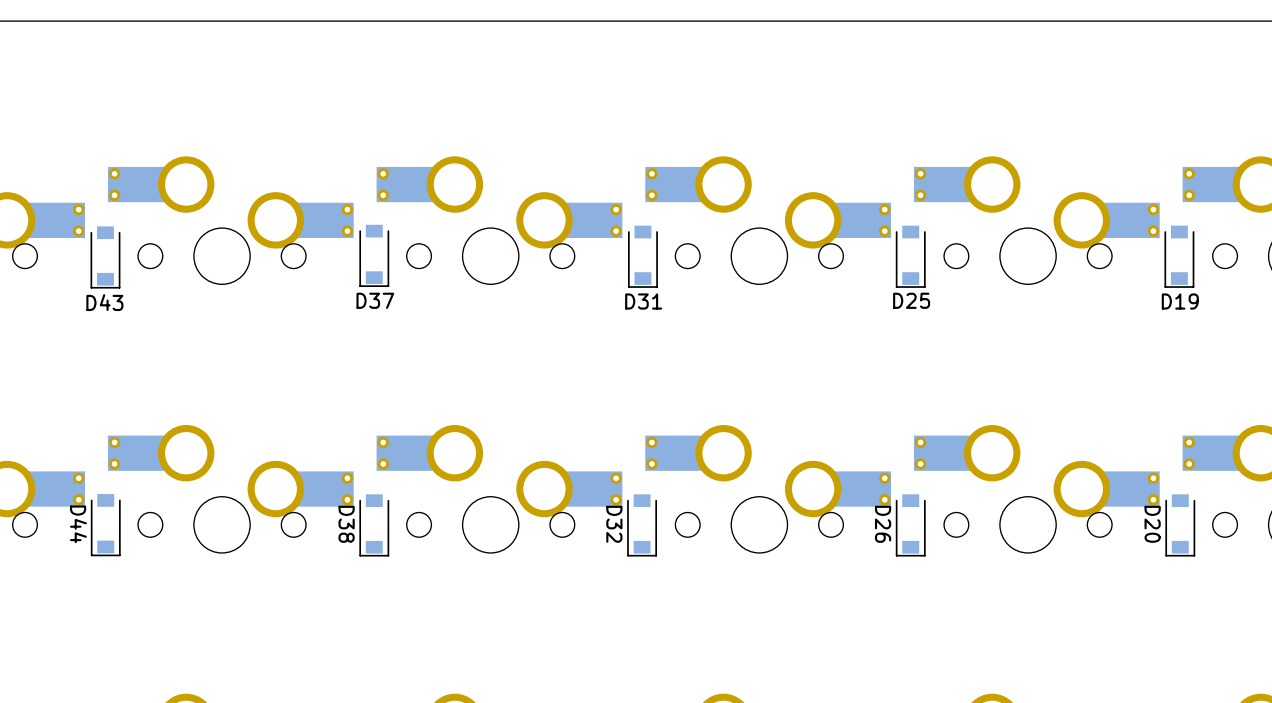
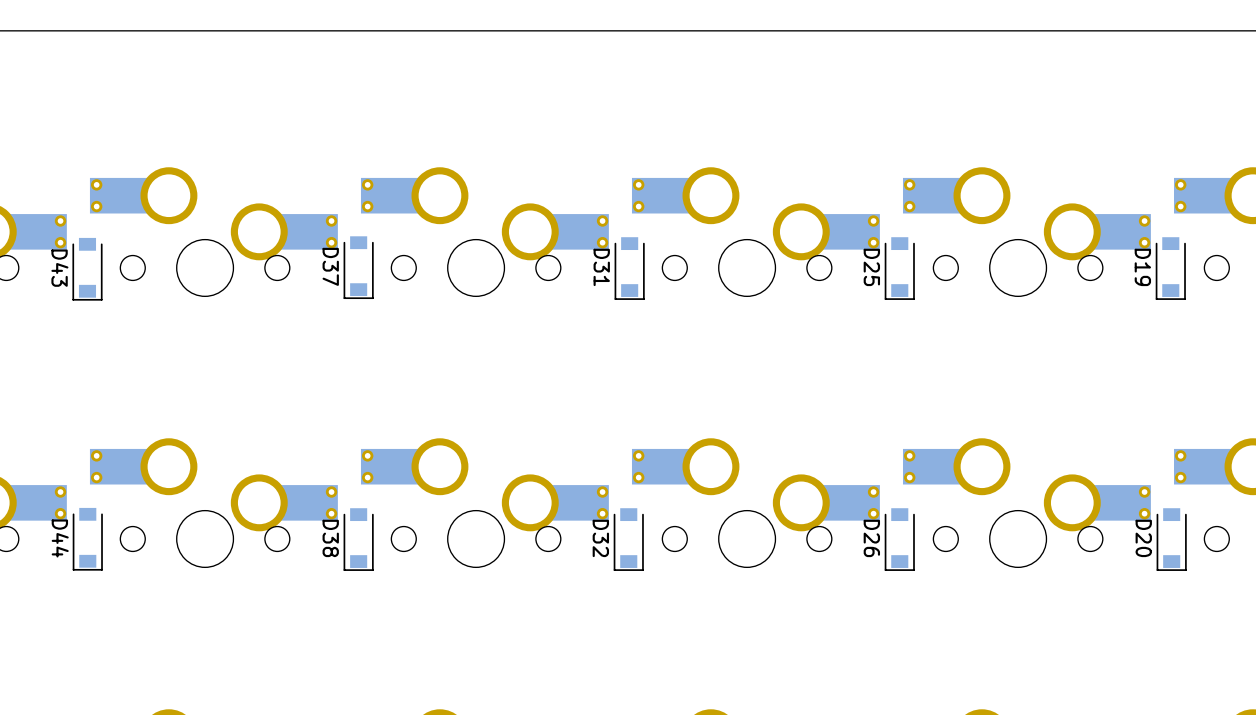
D37 name rotation: 0° (375, 300) -> 90° clockwise (330, 266)
D37 name position: D37 (375, 300) -> D37 (330, 266)
D25 name rotation: 0° (911, 300) -> 90° clockwise (871, 267)
D25 name position: D25 (911, 300) -> D25 (871, 267)
D31 name rotation: 0° (643, 301) -> 90° clockwise (601, 267)
D31 name position: D31 (643, 301) -> D31 (601, 267)
D19 name rotation: 0° (1180, 301) -> 90° clockwise (1142, 267)
D19 name position: D19 (1180, 301) -> D19 (1142, 267)
D43 name rotation: 0° (104, 302) -> 90° clockwise (59, 268)
D43 name position: D43 (104, 302) -> D43 (59, 268)

